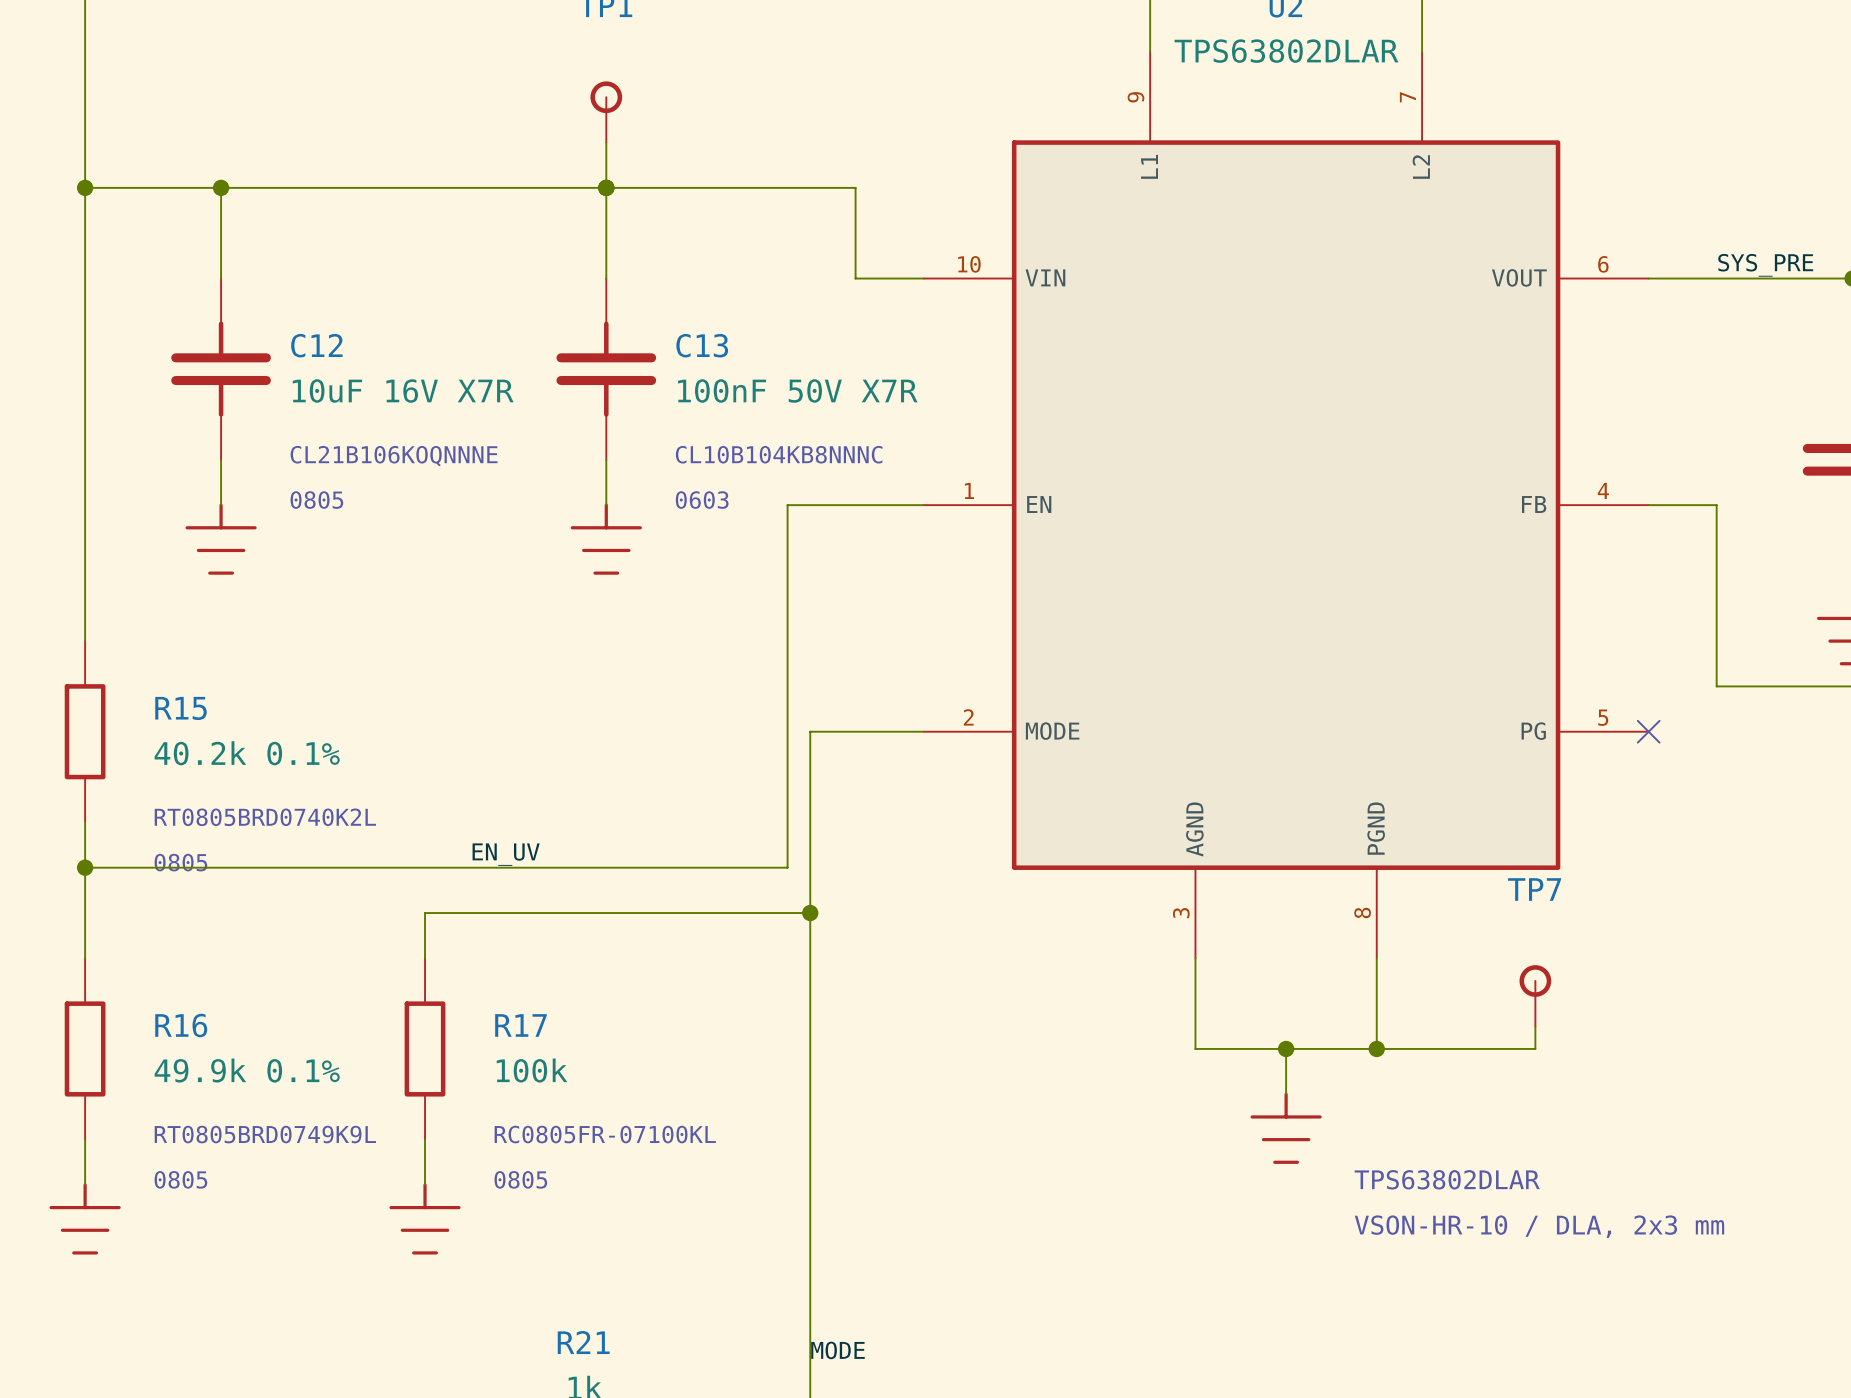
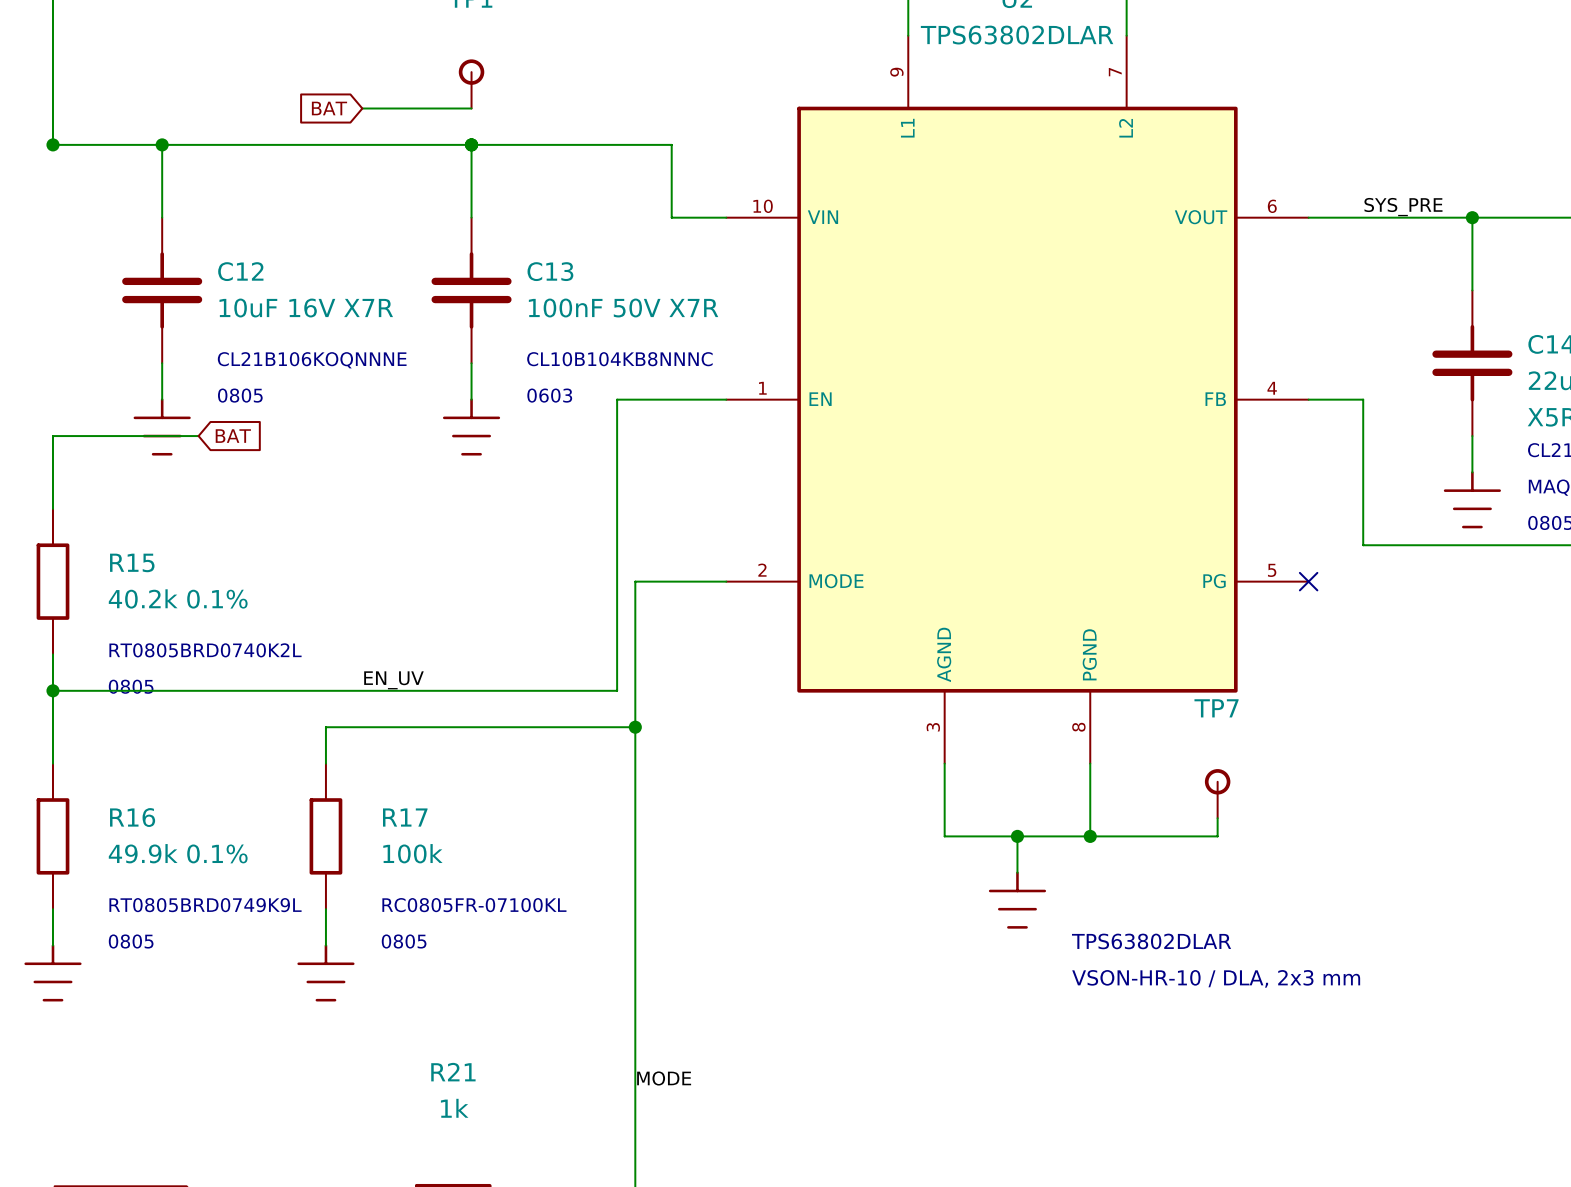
global label: none -> BAT (329, 108)
wire: (606, 142) (606, 187) -> (471, 108) (362, 108)
wire: (85, 187) (85, 550) -> (198, 436) (52, 436)
global label: none -> BAT (233, 436)

